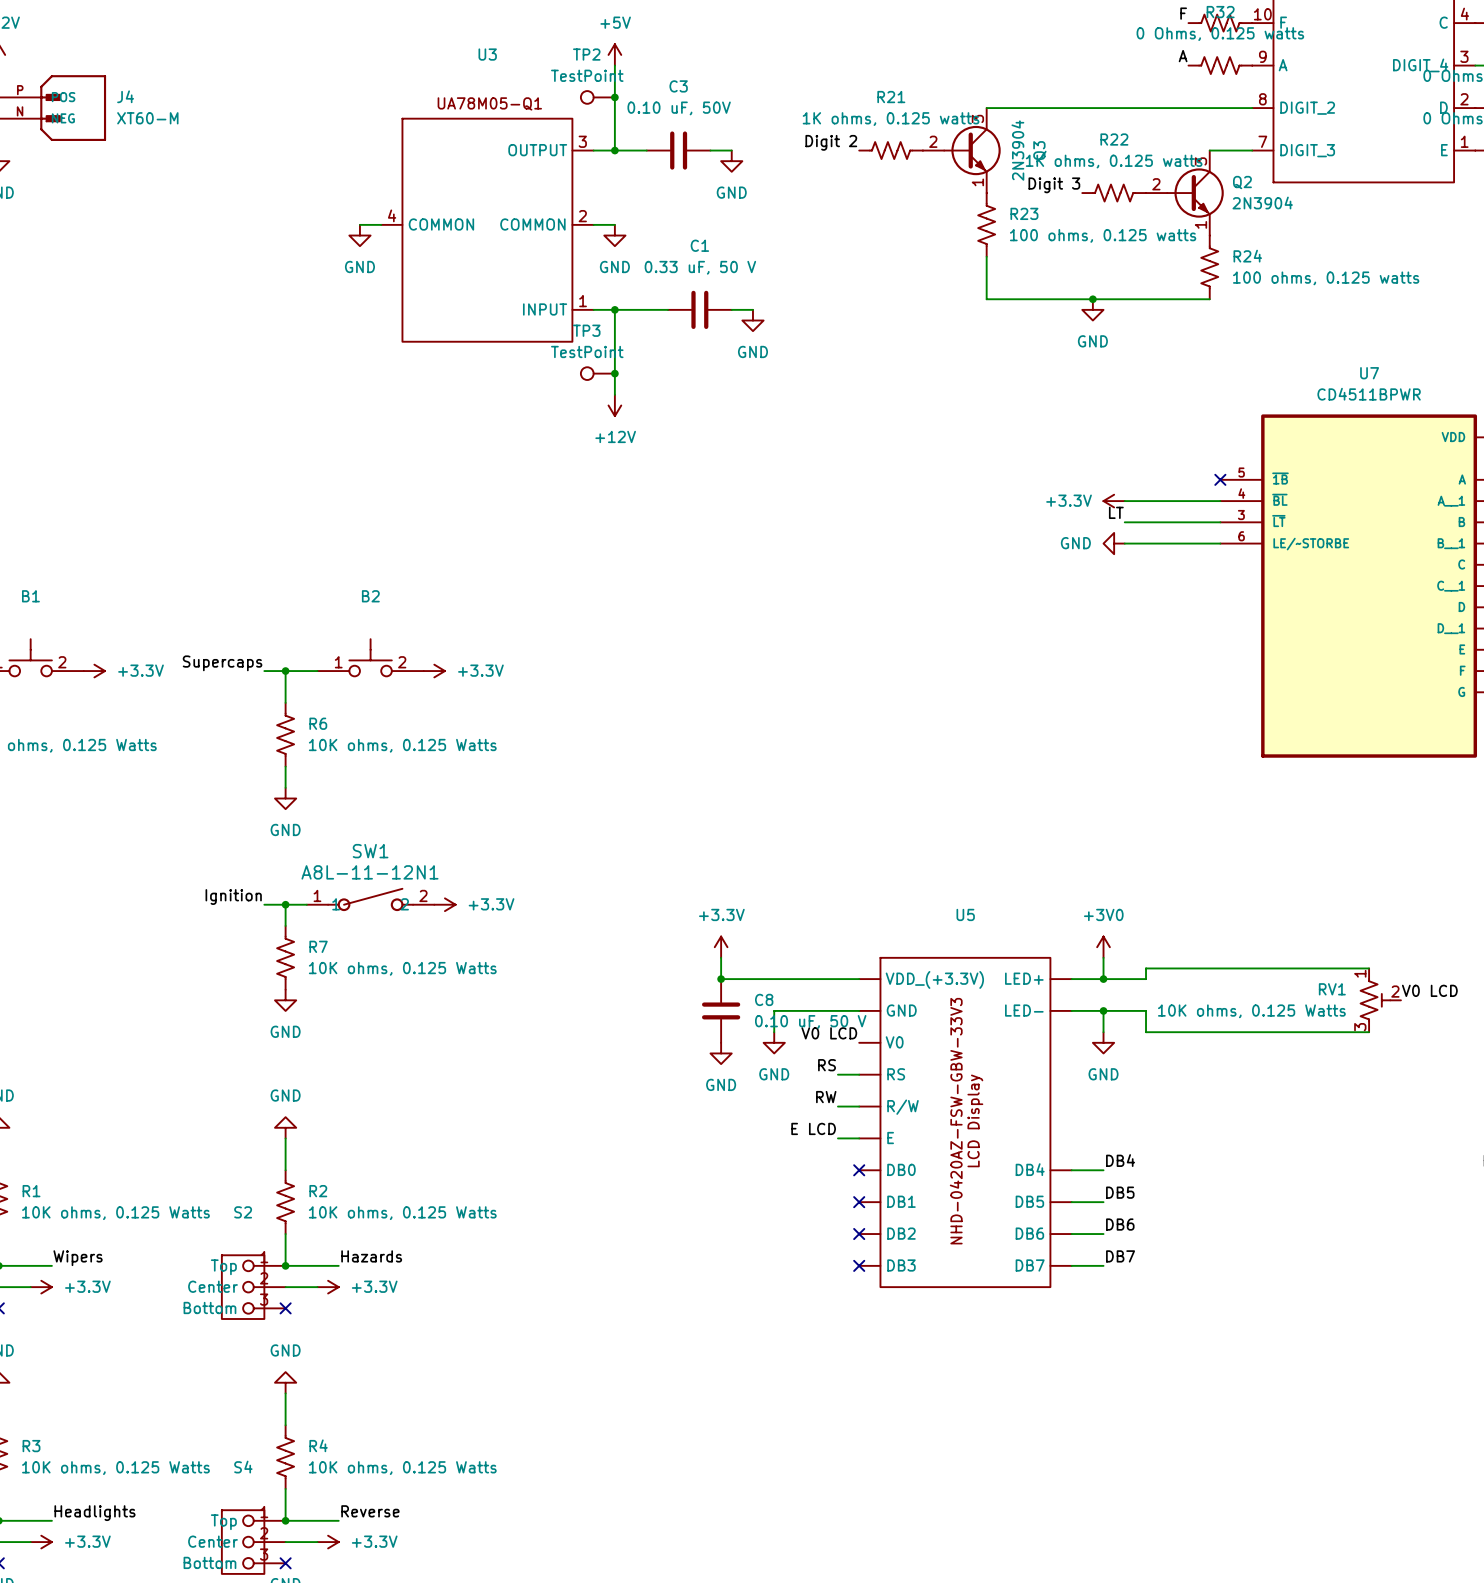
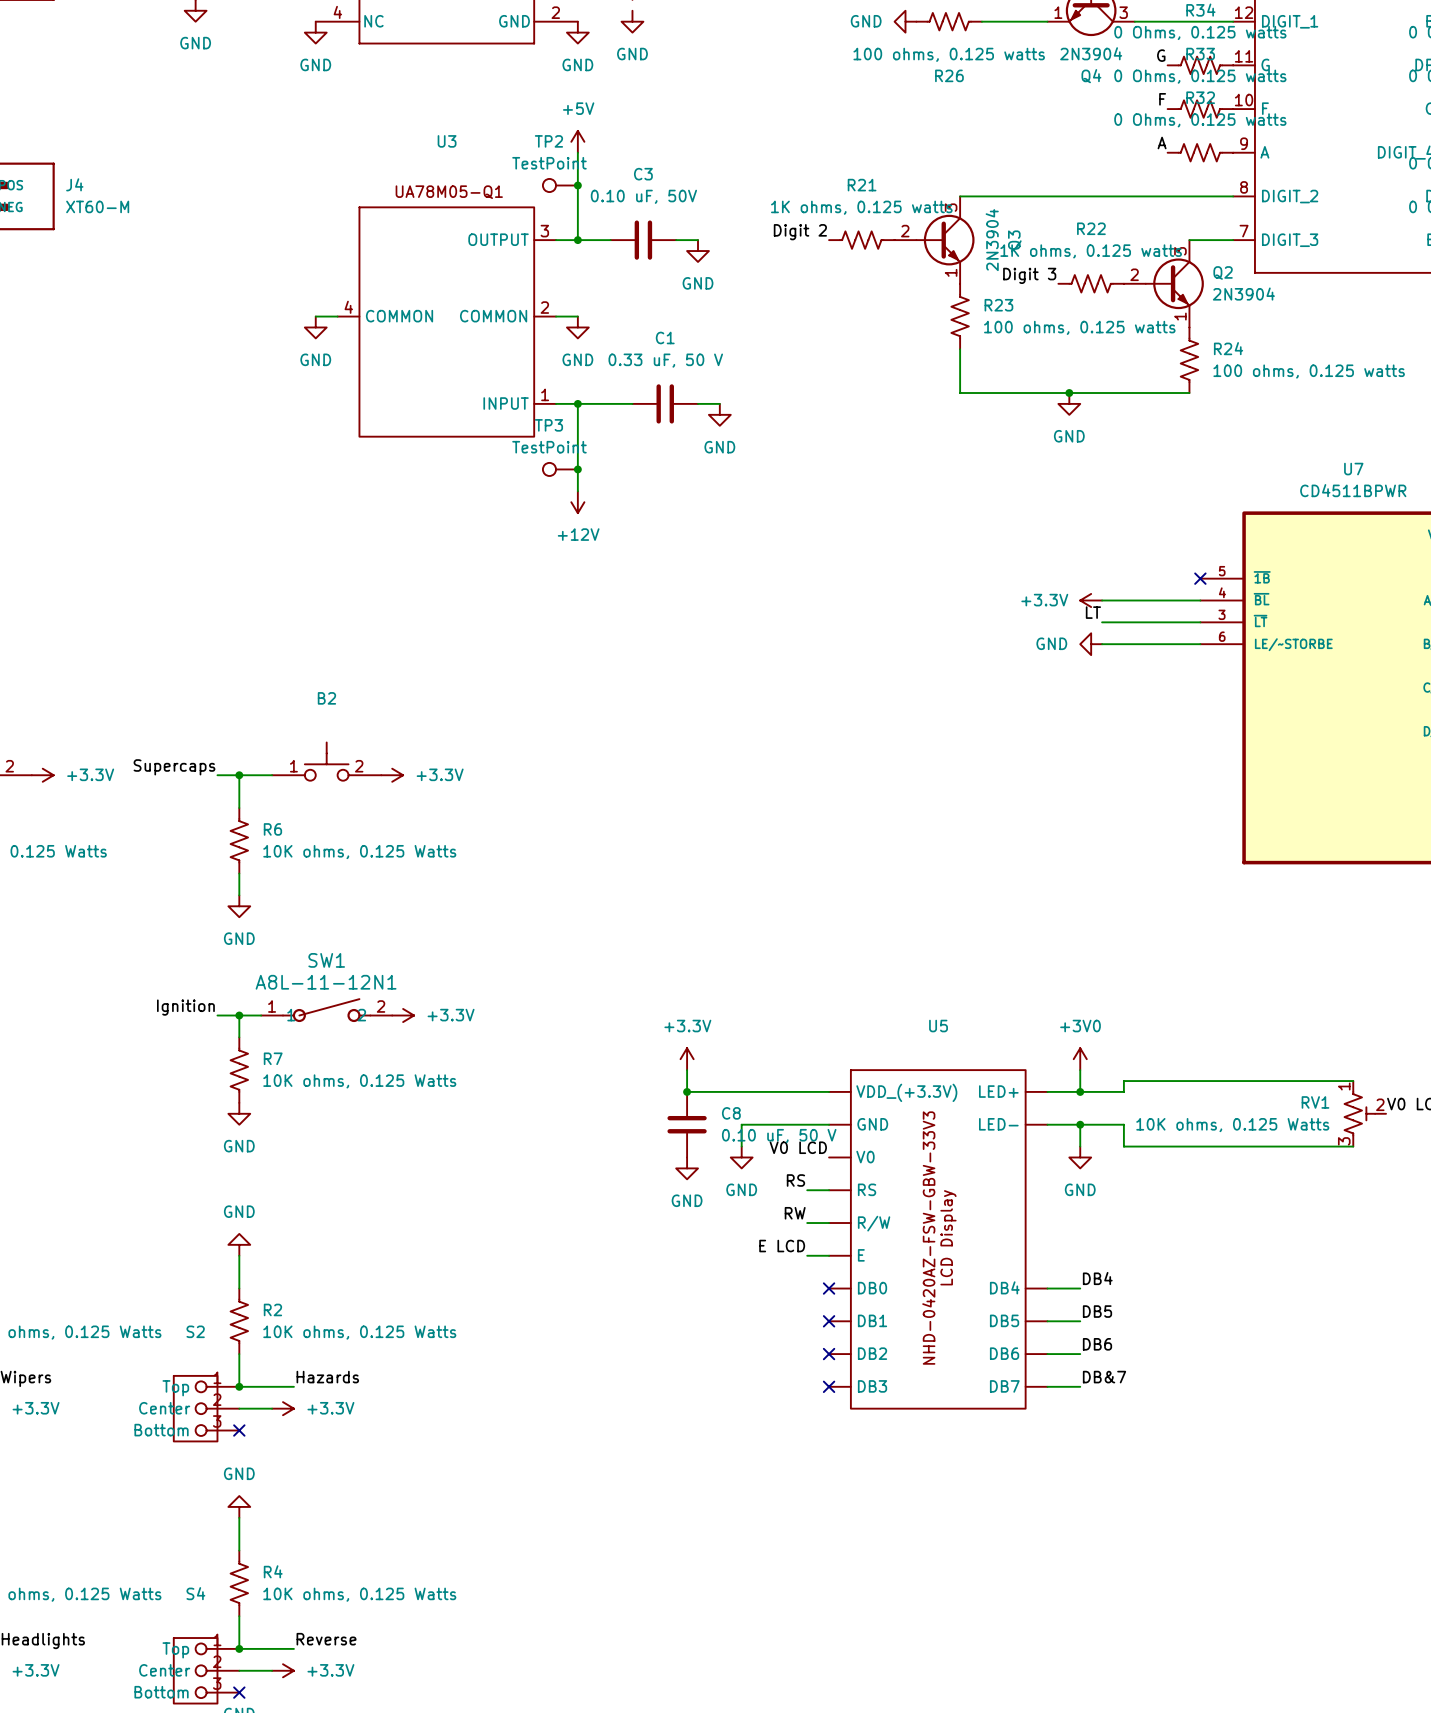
label: DB7 (1120, 1256) -> DB&7 (1104, 1377)

